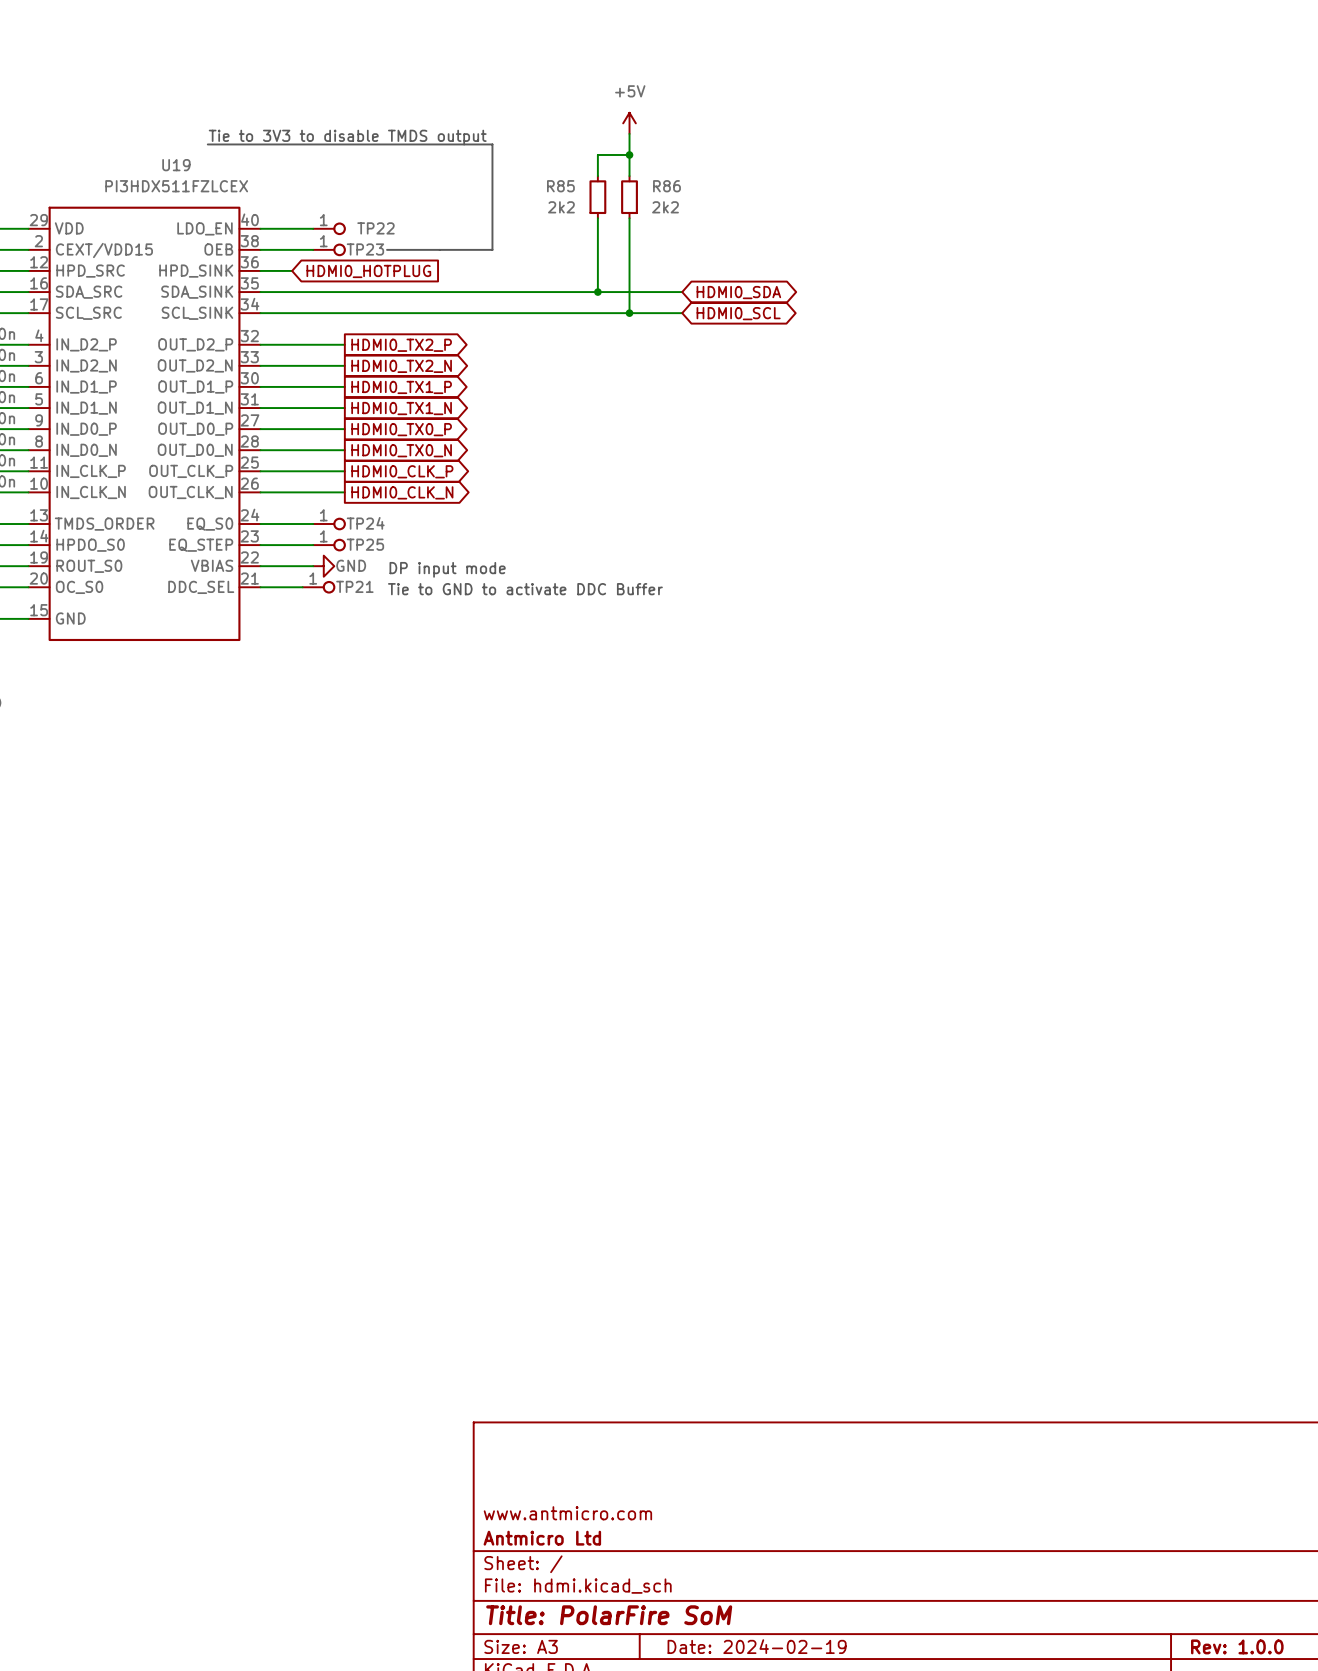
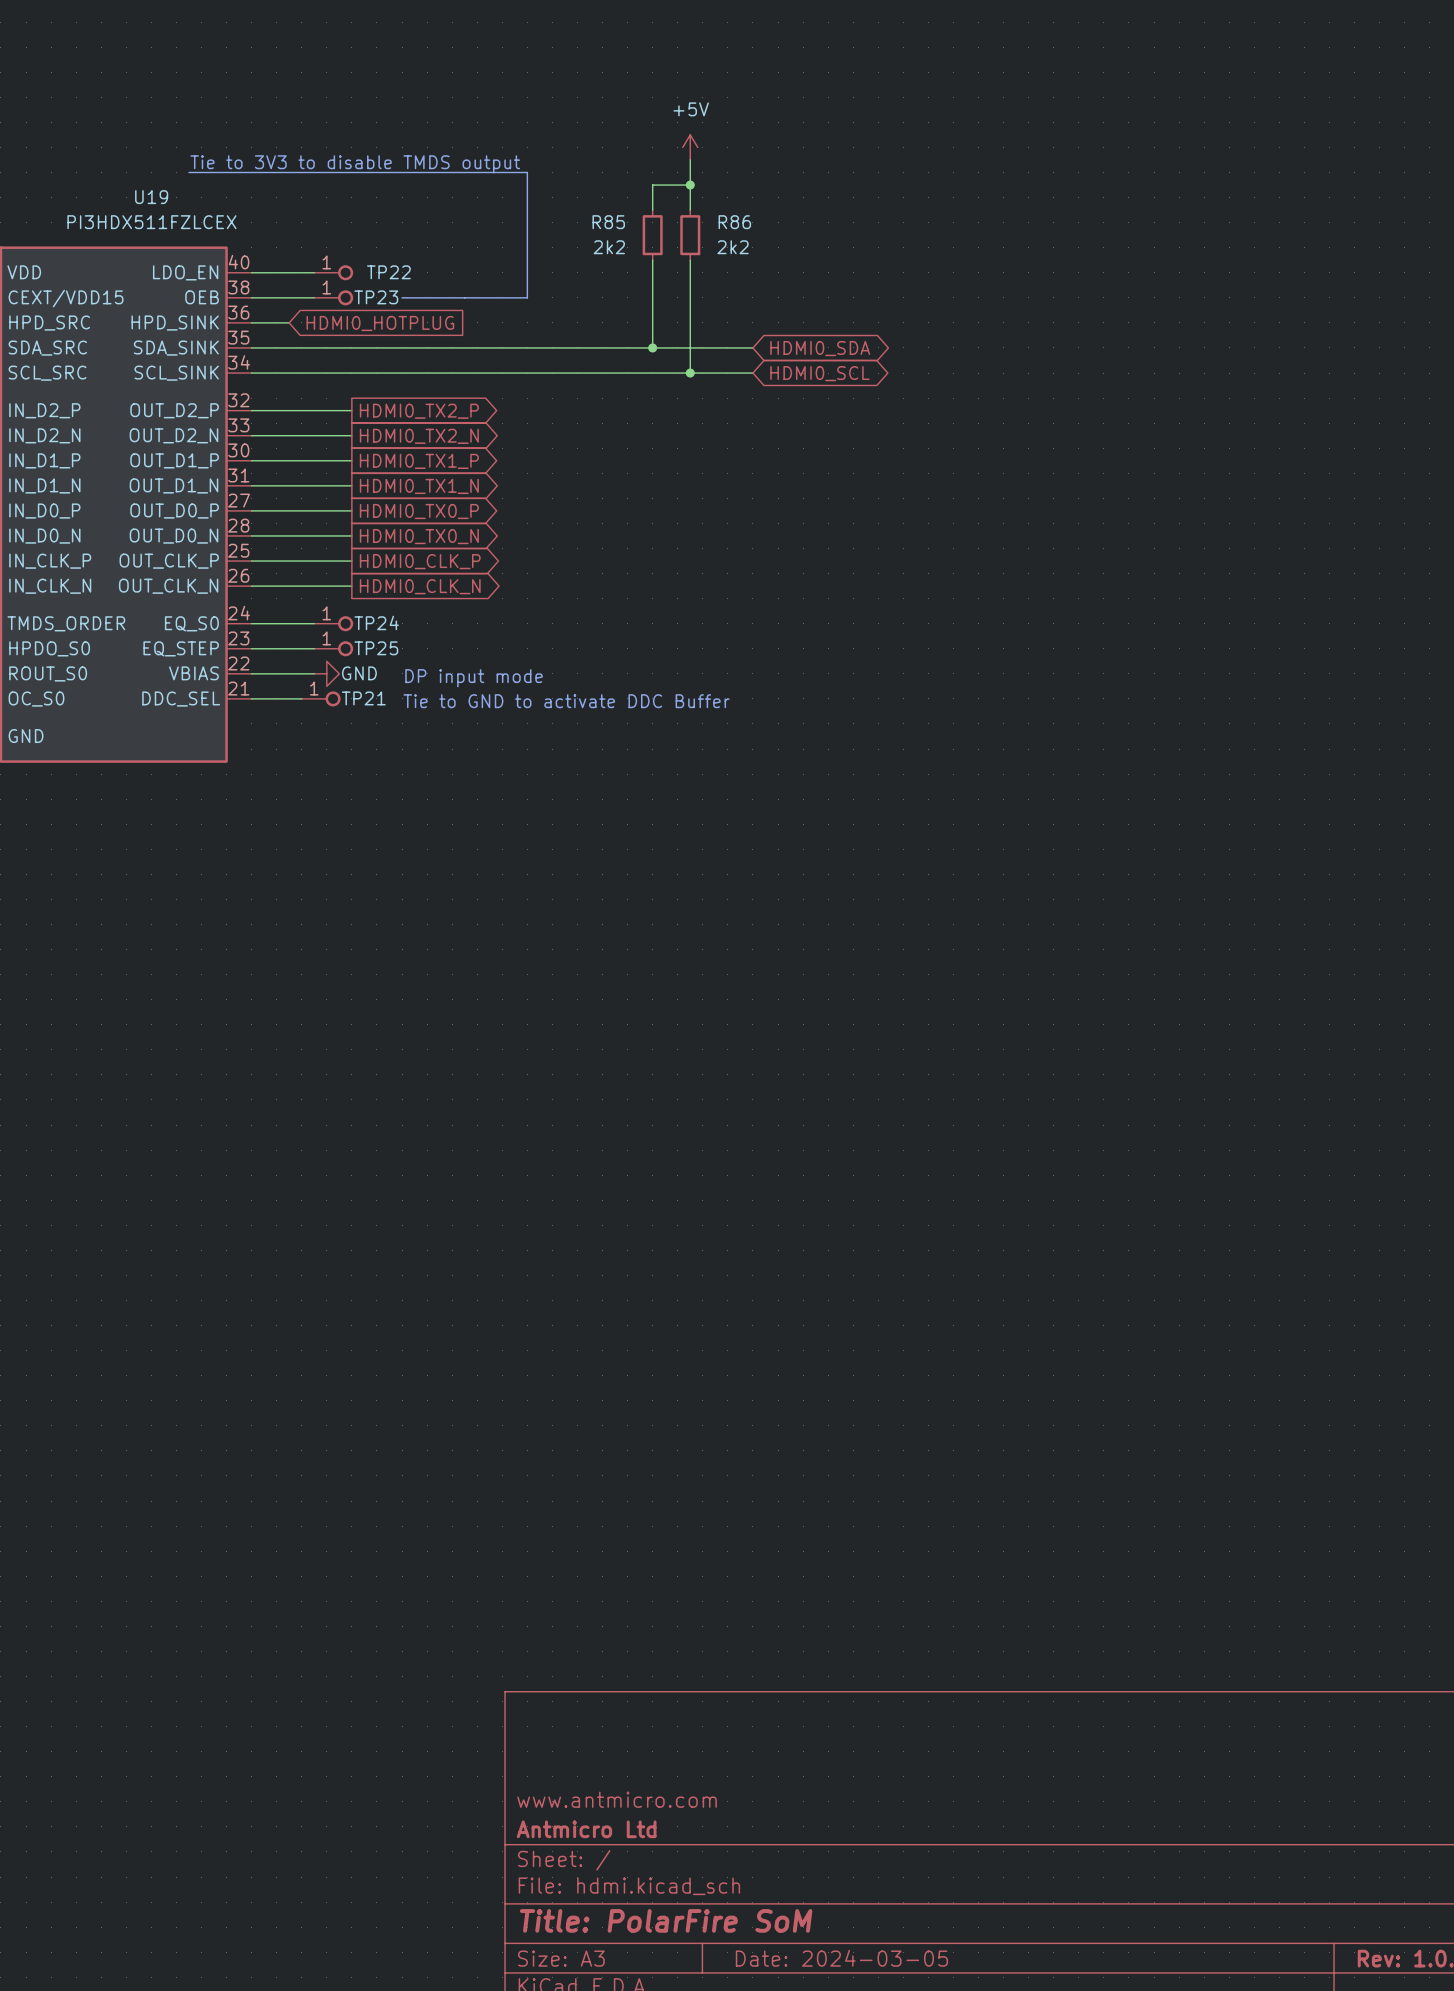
title block: Date: 2024-02-19 (757, 1646) -> Date: 2024-03-05 (841, 1958)

